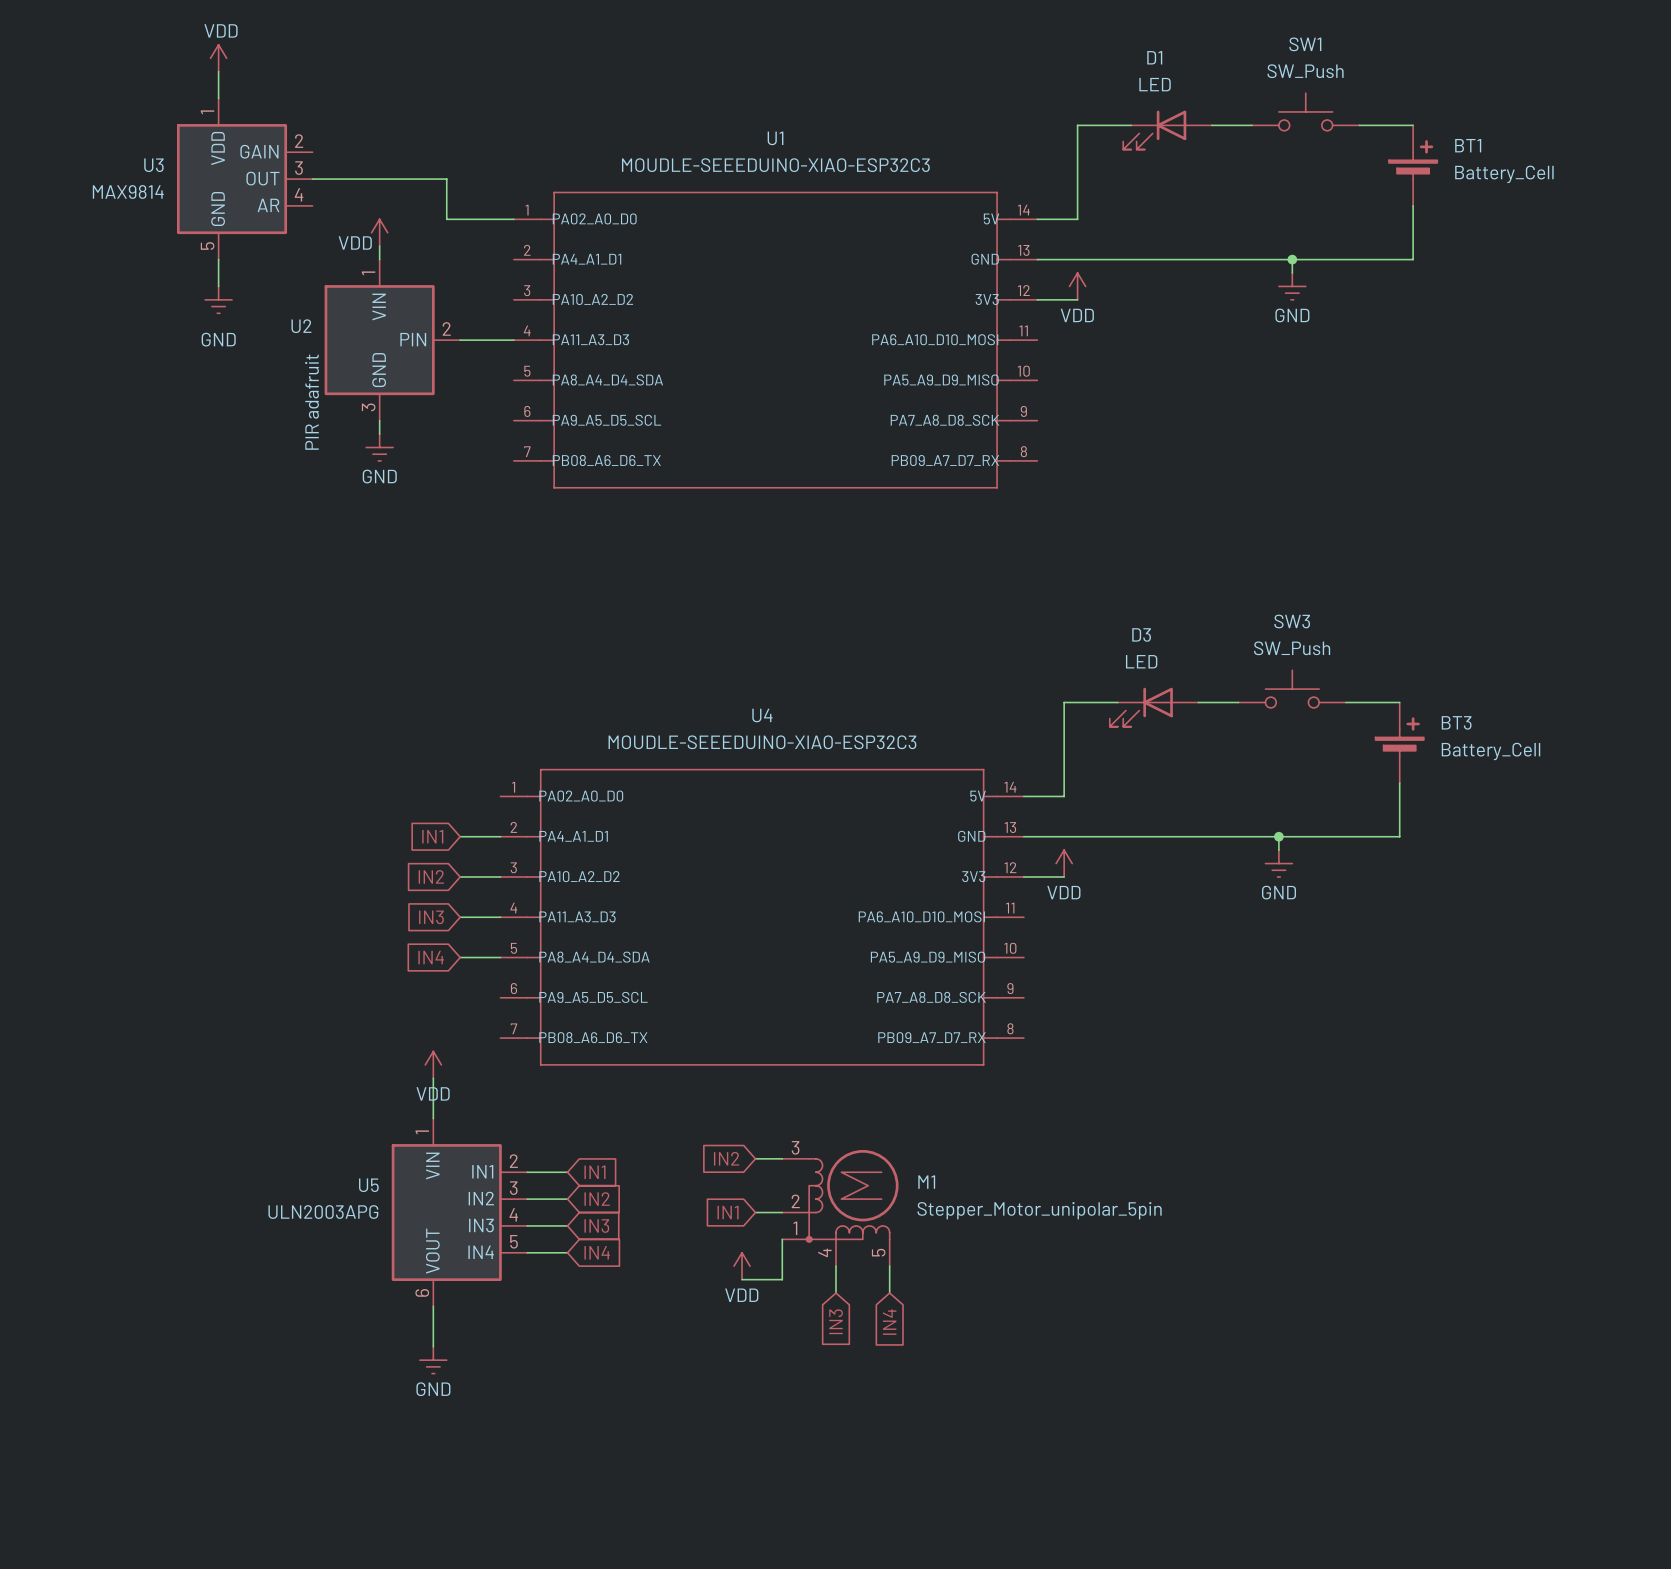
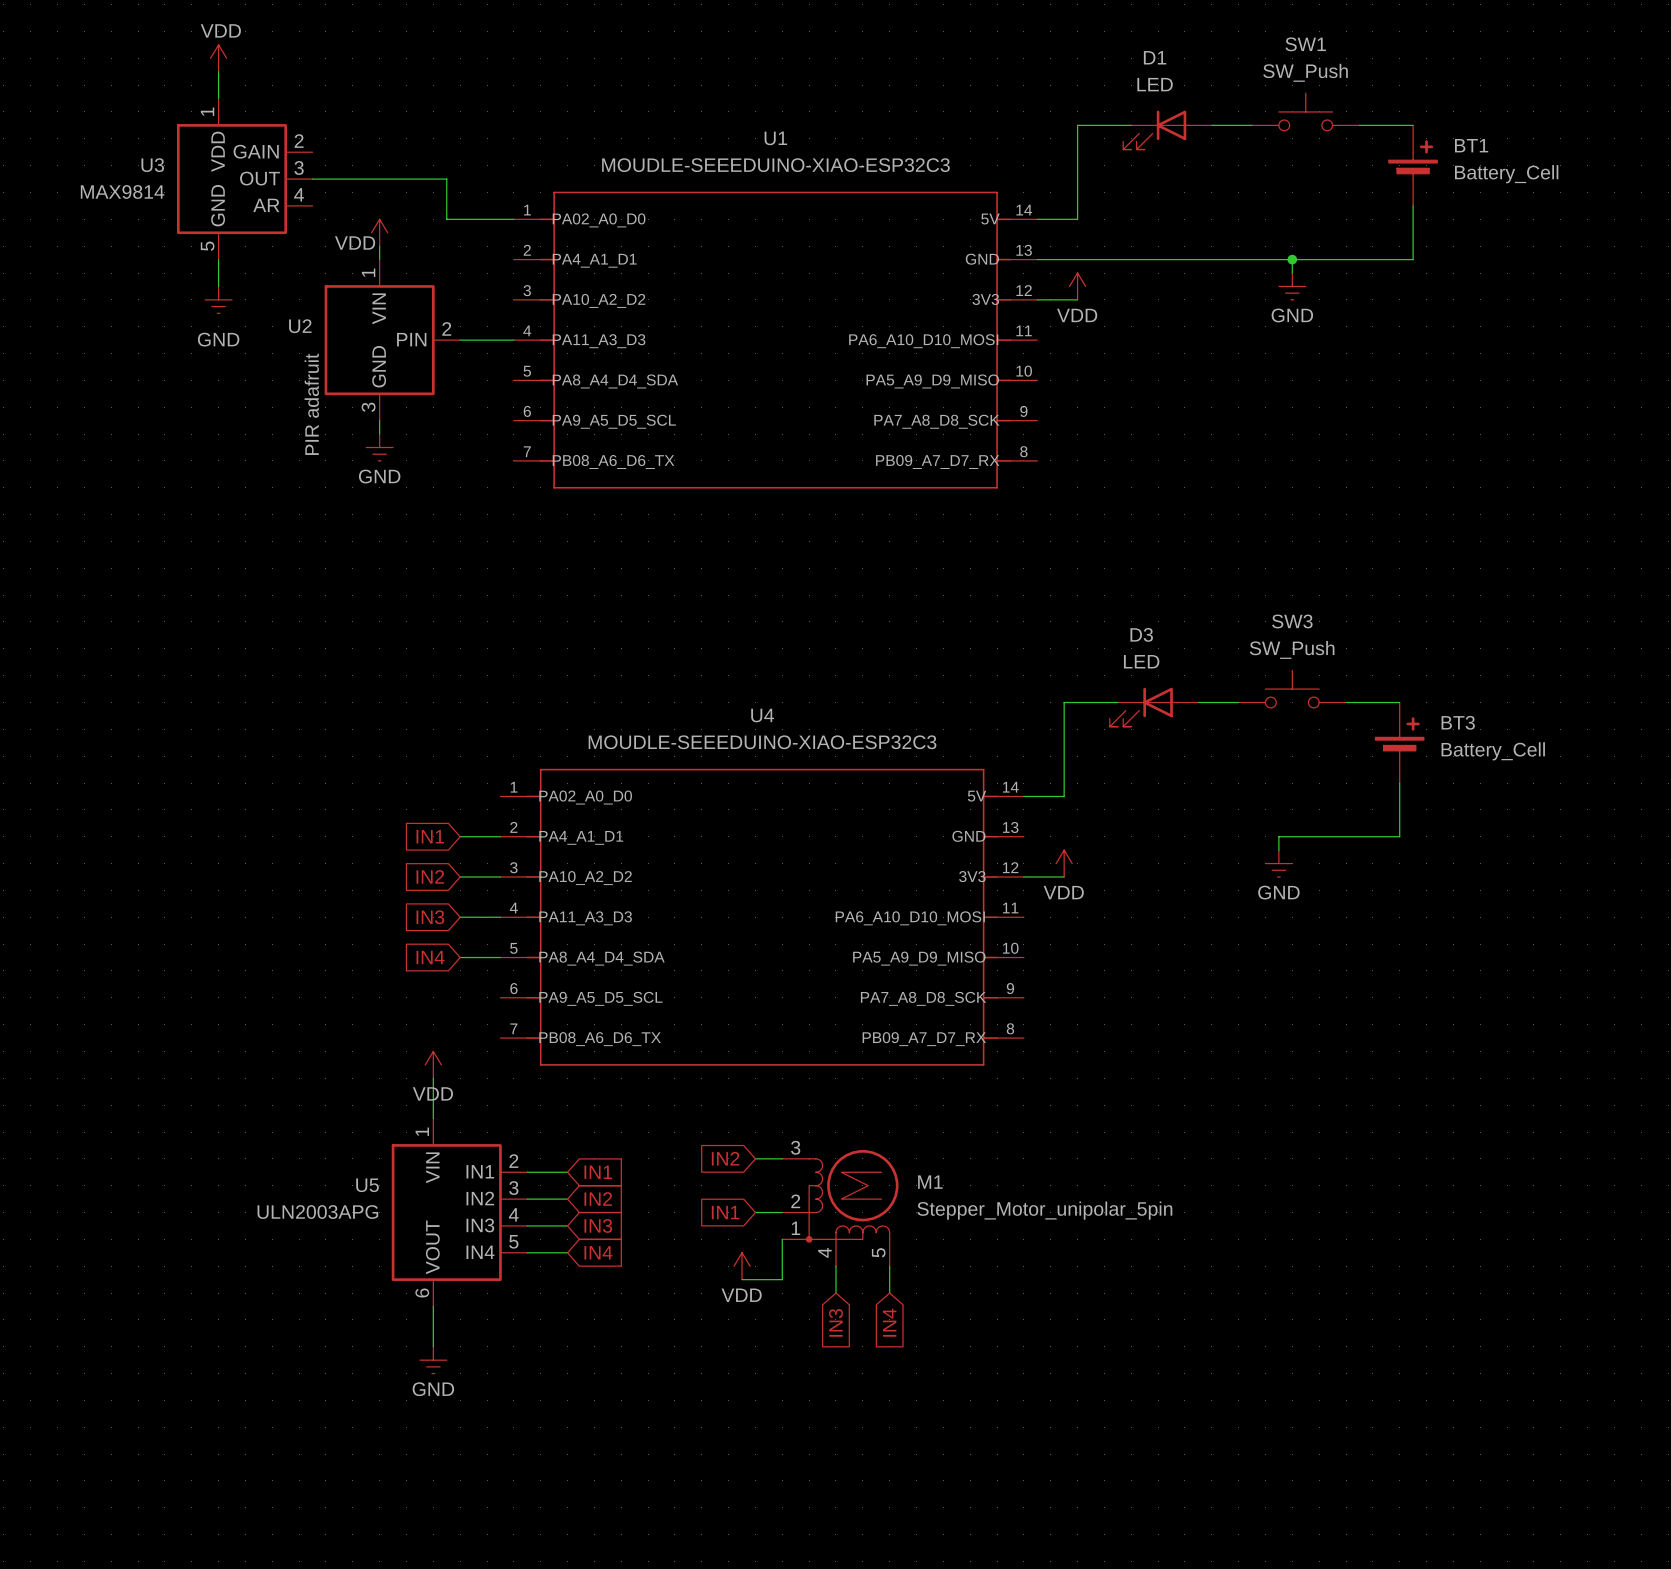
wire: (1023, 836) (1278, 836) -> none
junction: (1278, 836) -> none

